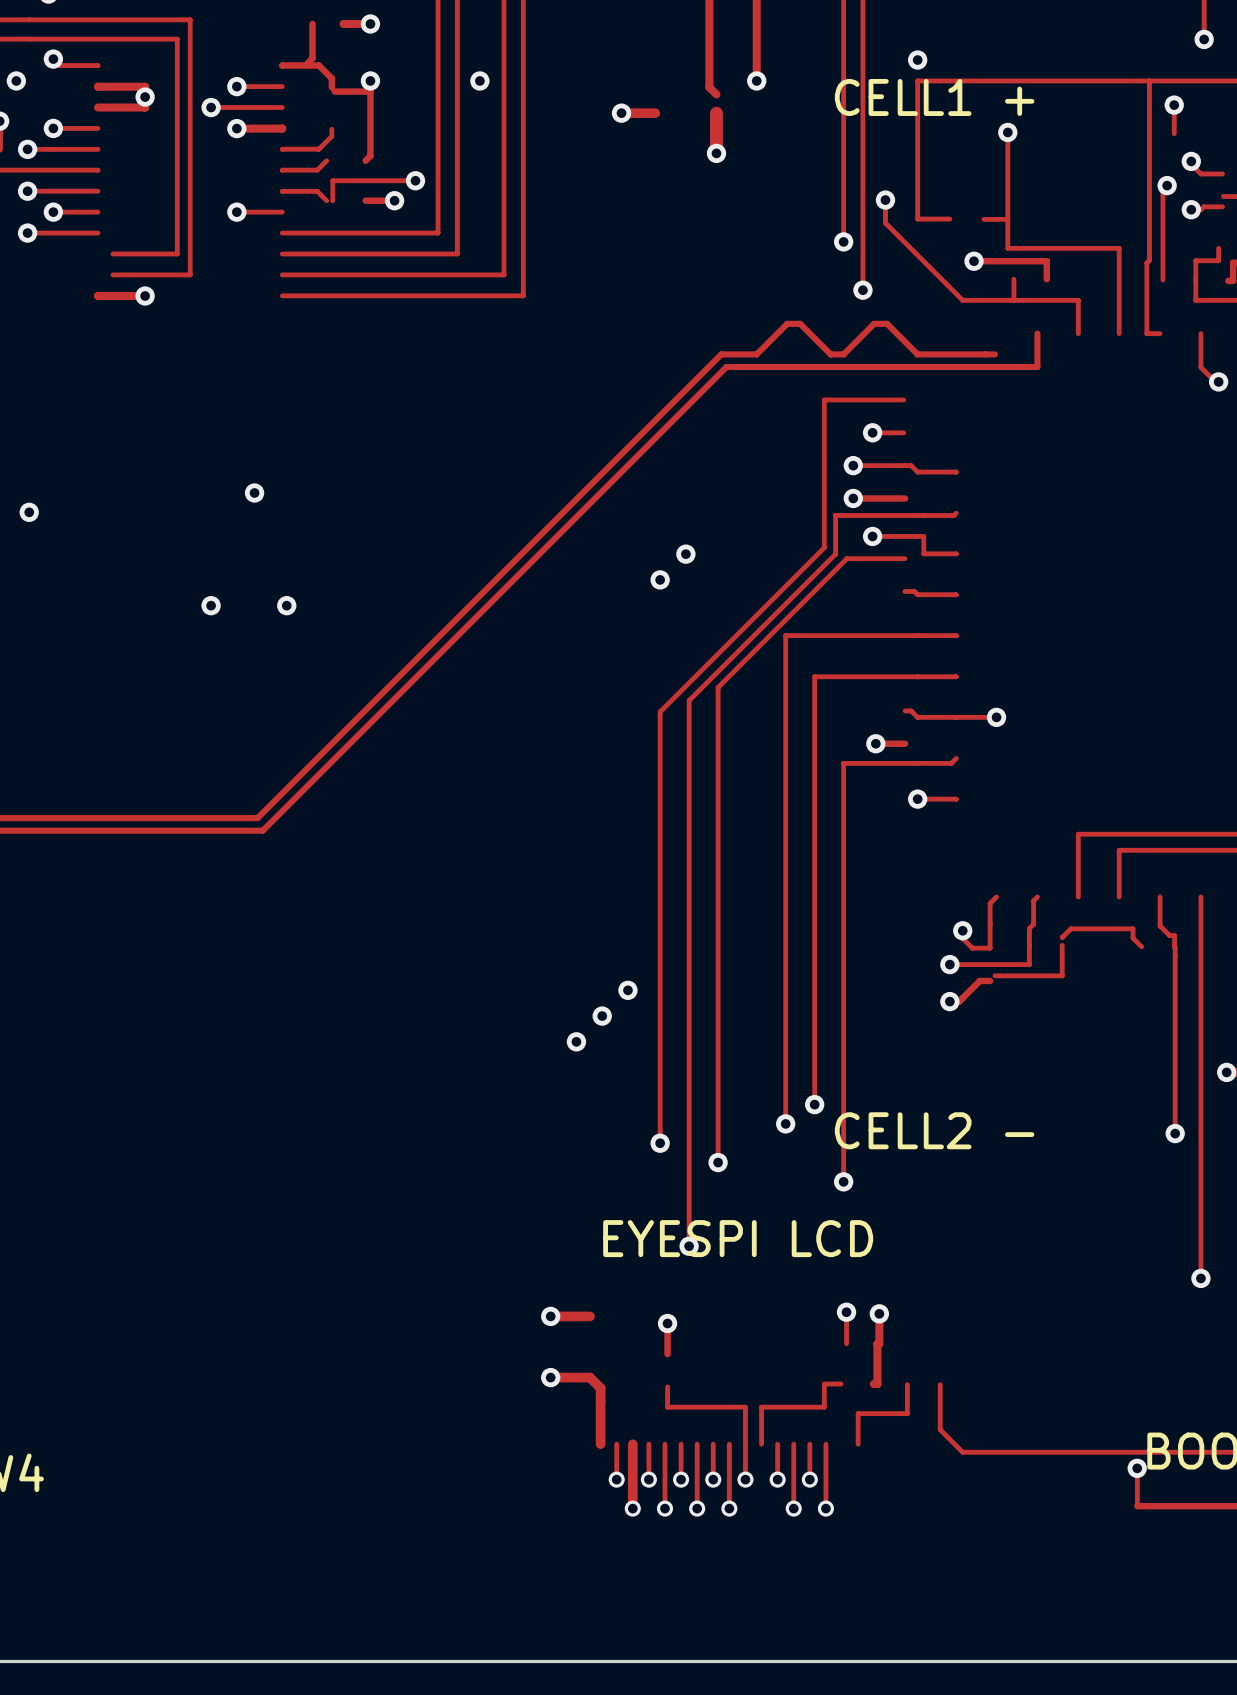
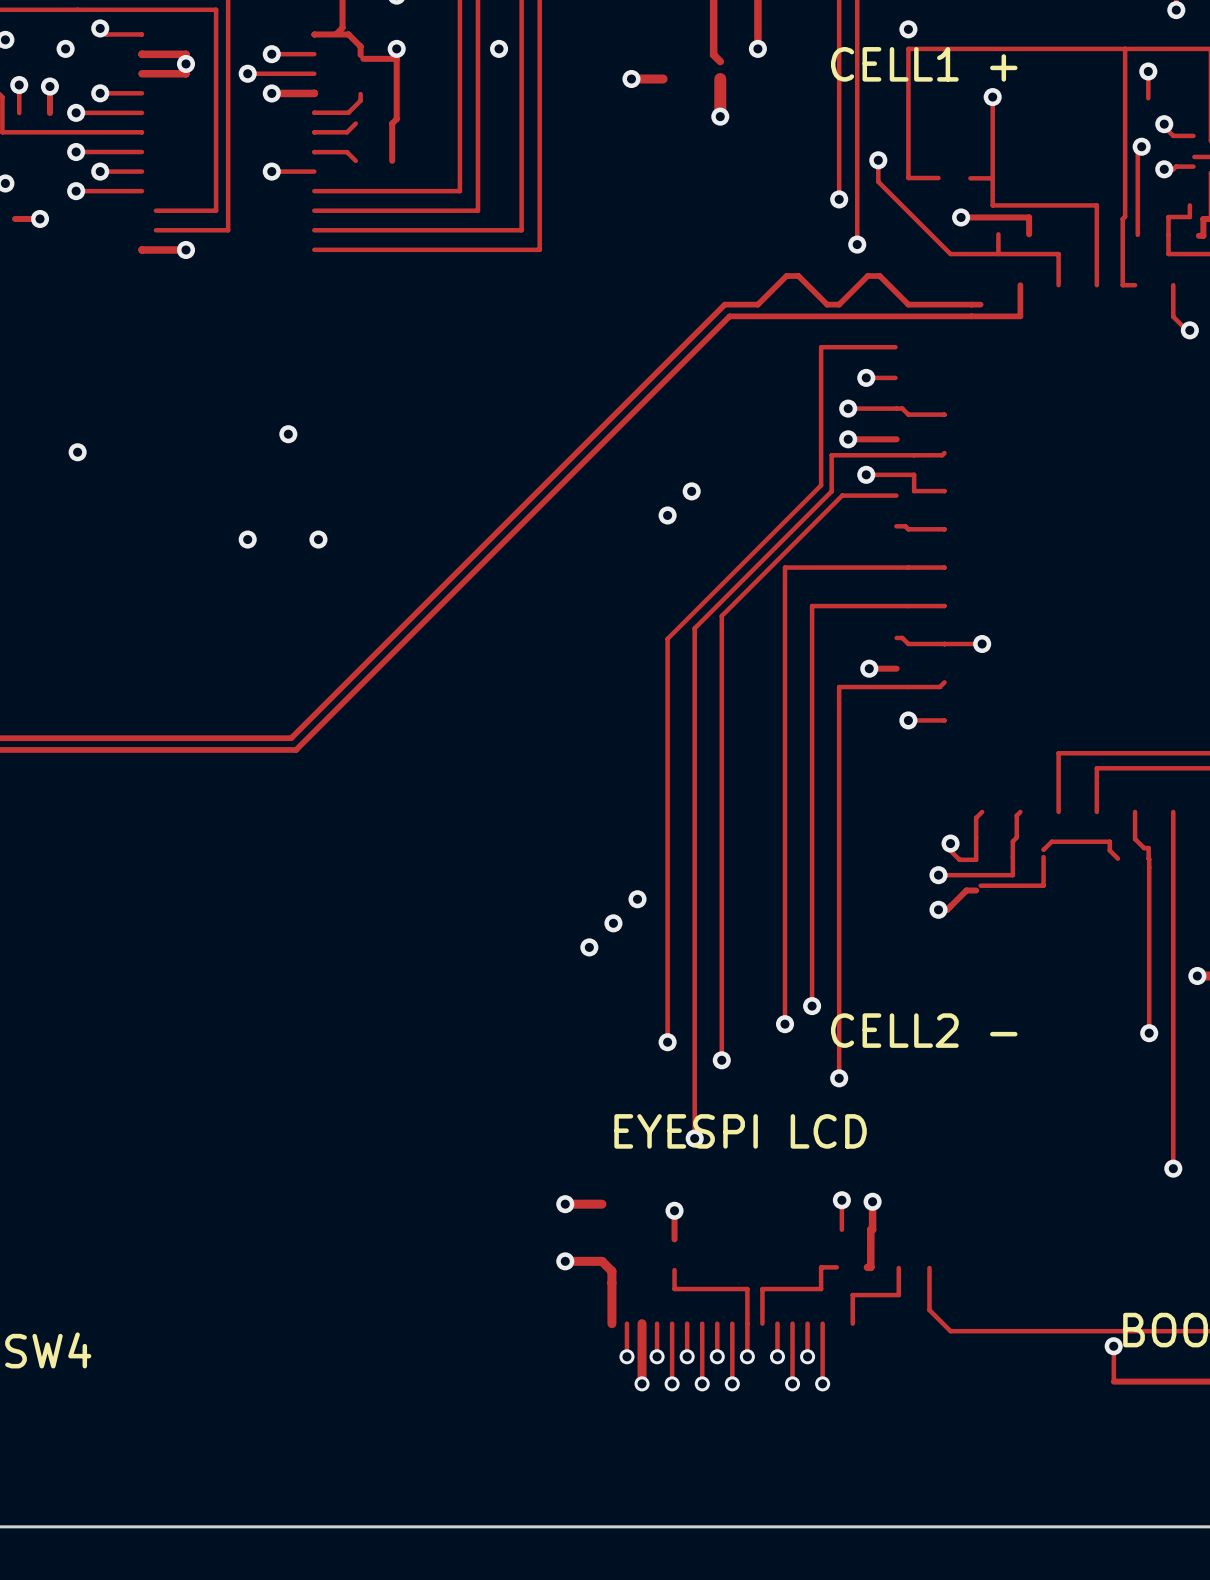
track: (415, 180) (332, 180) (332, 200) -> none
via: (415, 180) -> none
track: (365, 200) (394, 200) -> (392, 160) (392, 123)
via: (394, 200) -> none

